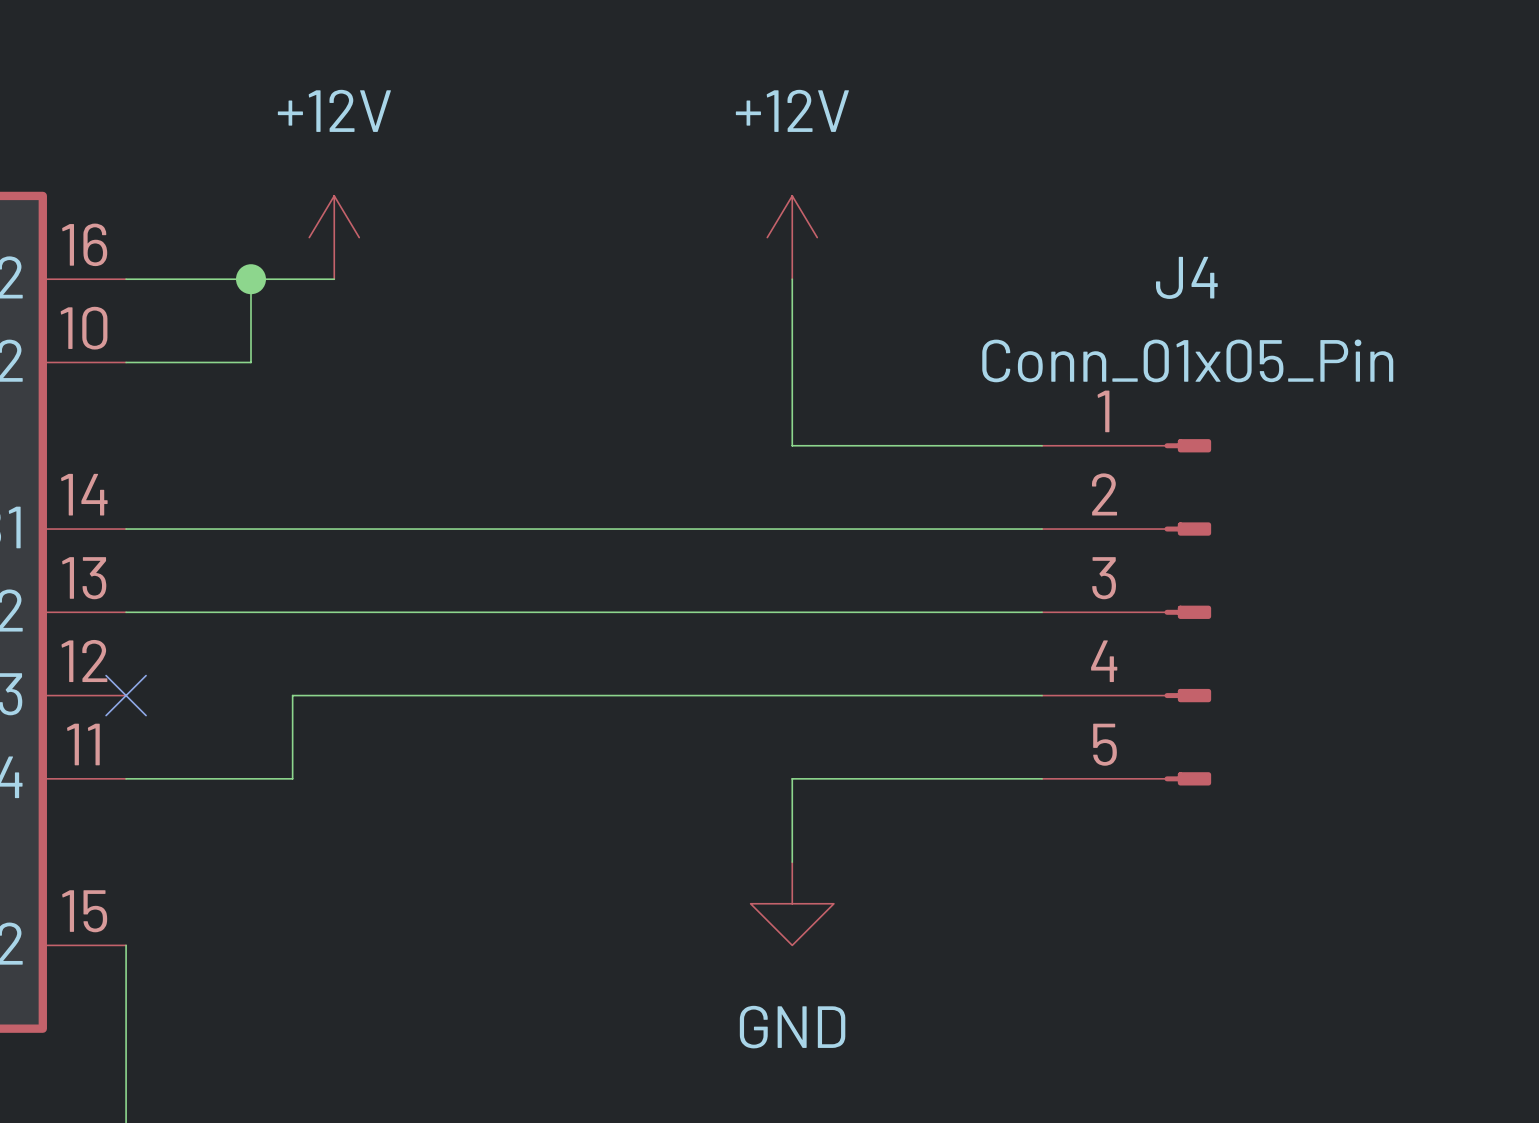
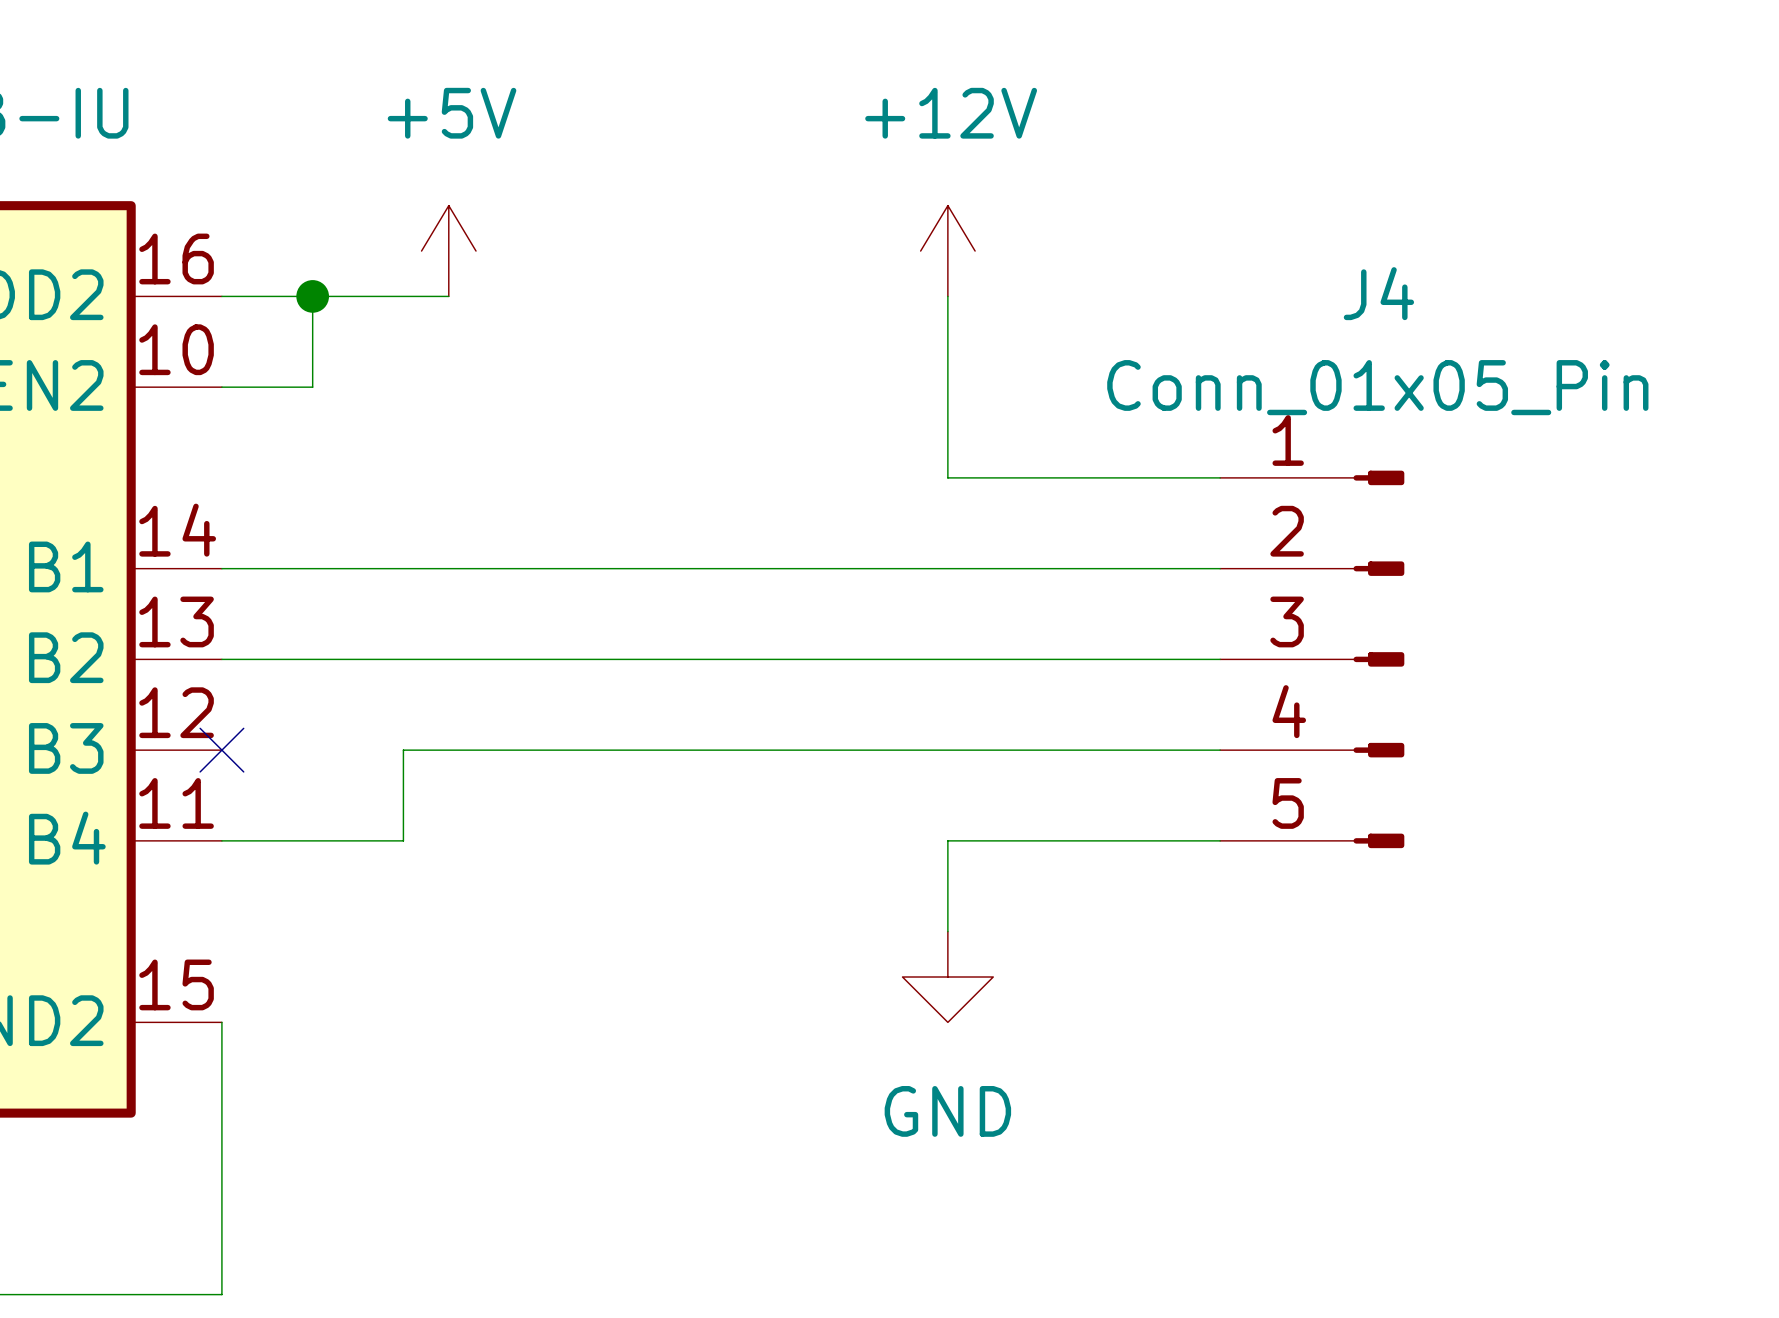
power symbol: +12V (334, 237) -> +5V (448, 251)
wire: (250, 279) (250, 362) (209, 362) -> (312, 296) (312, 387)
junction position: (250, 279) -> (312, 296)

